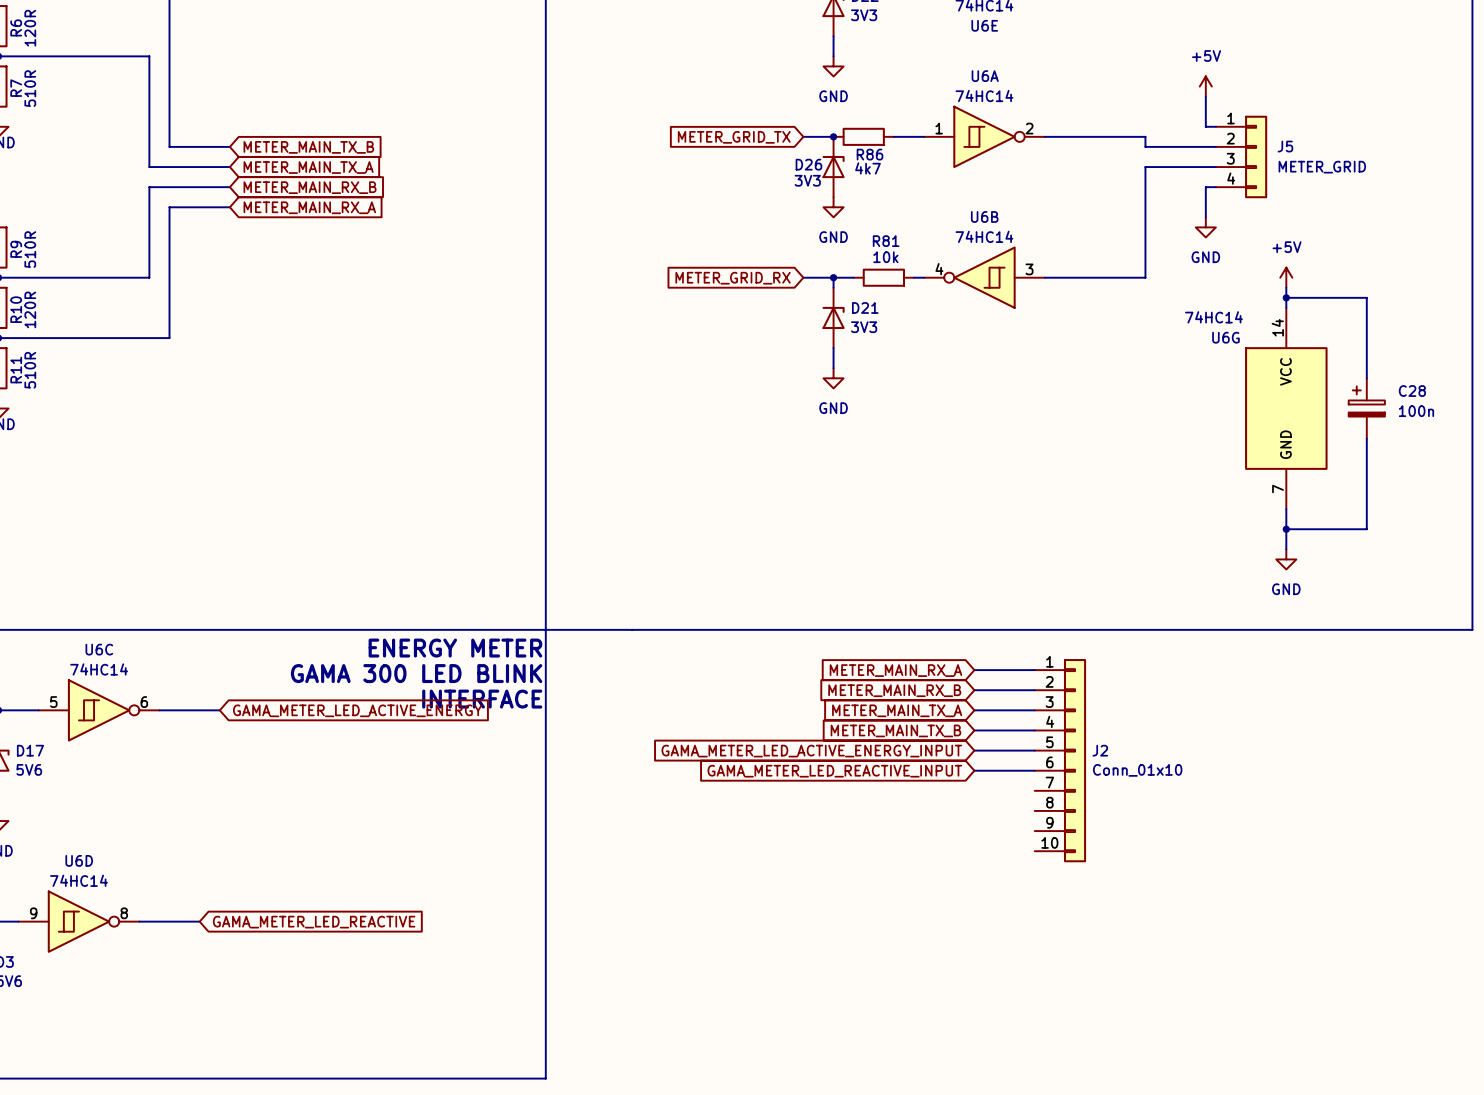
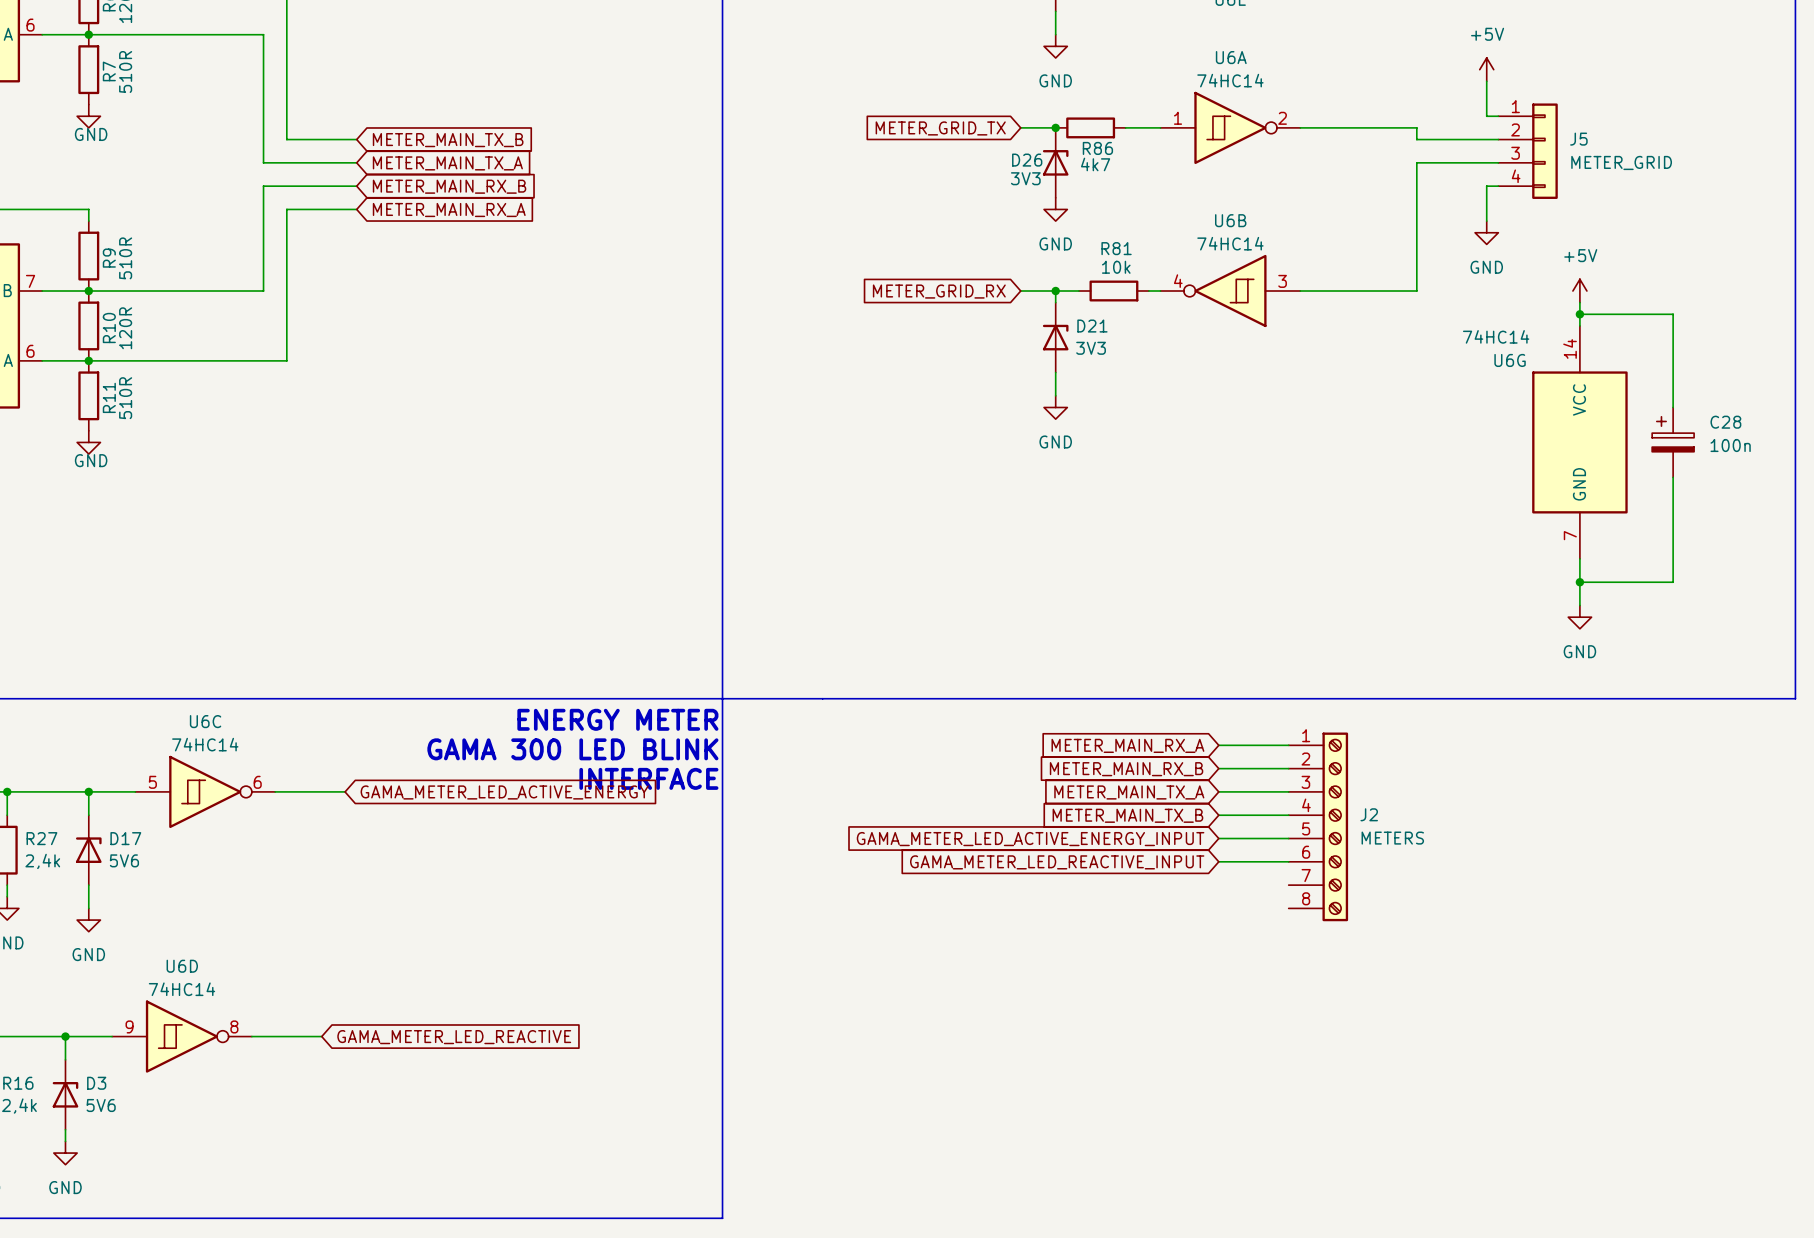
J2 symbol: [1034, 659, 1087, 863] -> [1288, 732, 1349, 922]
J2 value: Conn_01x10 (1137, 770) -> METERS (1392, 838)

